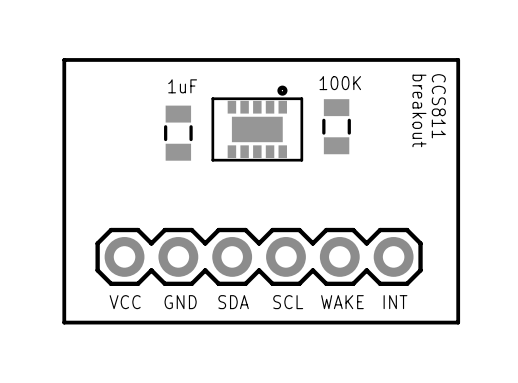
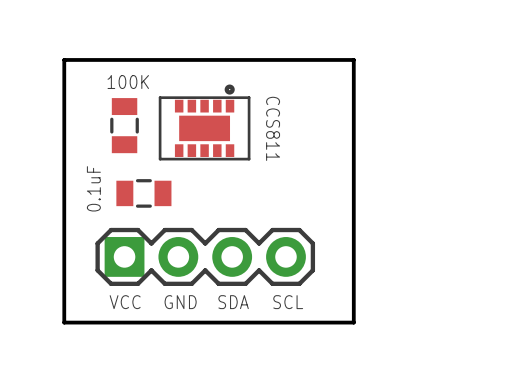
board edge: (353, 59) (458, 59) (458, 322) (353, 322) -> (353, 59) (353, 322)
text position: CCS811 (438, 106) -> CCS811 (273, 128)
text: breakout (419, 110) -> none
part position: (257, 123) -> (204, 122)
part position: (336, 126) -> (124, 125)
part: 1uF (178, 133) -> none
part: none -> 0.1uF (143, 193)
part: none -> (205, 256)
part: (259, 256) -> none
text: WAKE (342, 302) -> none
text: INT (395, 302) -> none

